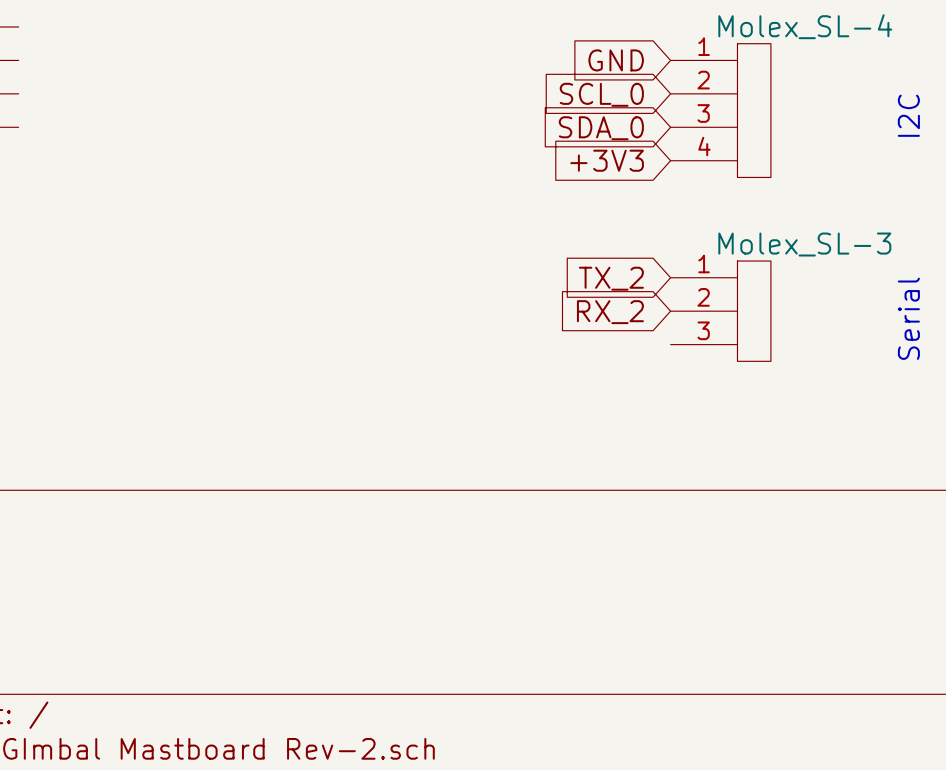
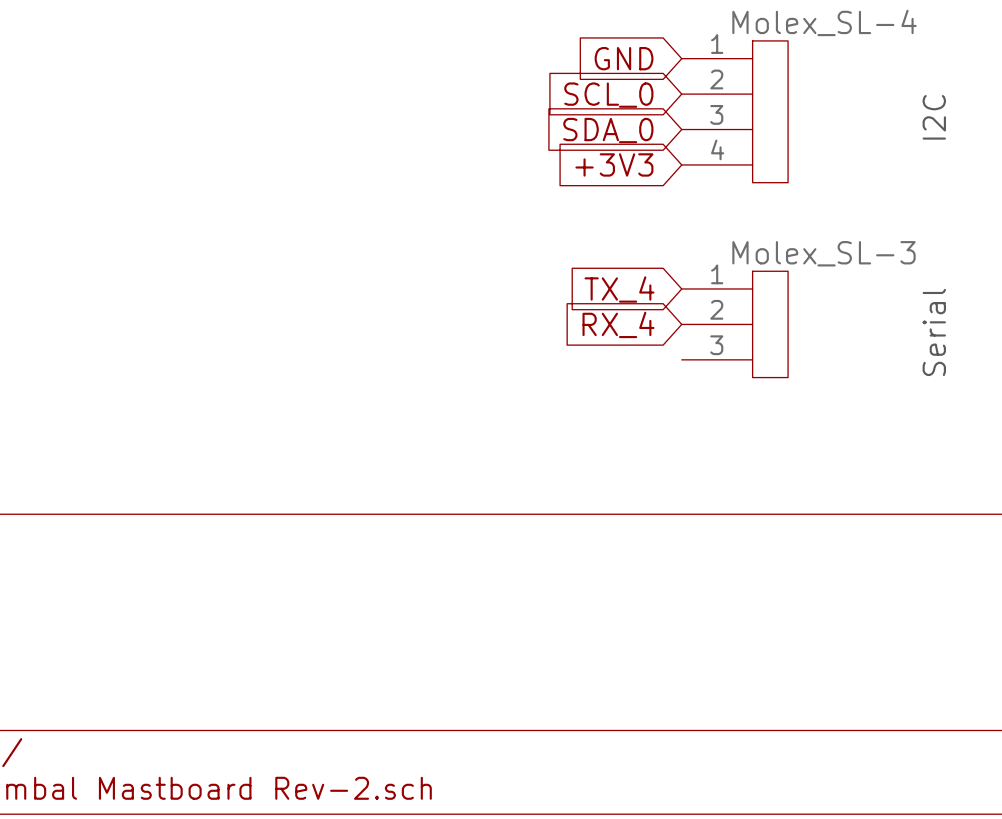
global label: TX_2 (611, 278) -> TX_4 (619, 289)
global label: RX_2 (610, 312) -> RX_4 (618, 324)

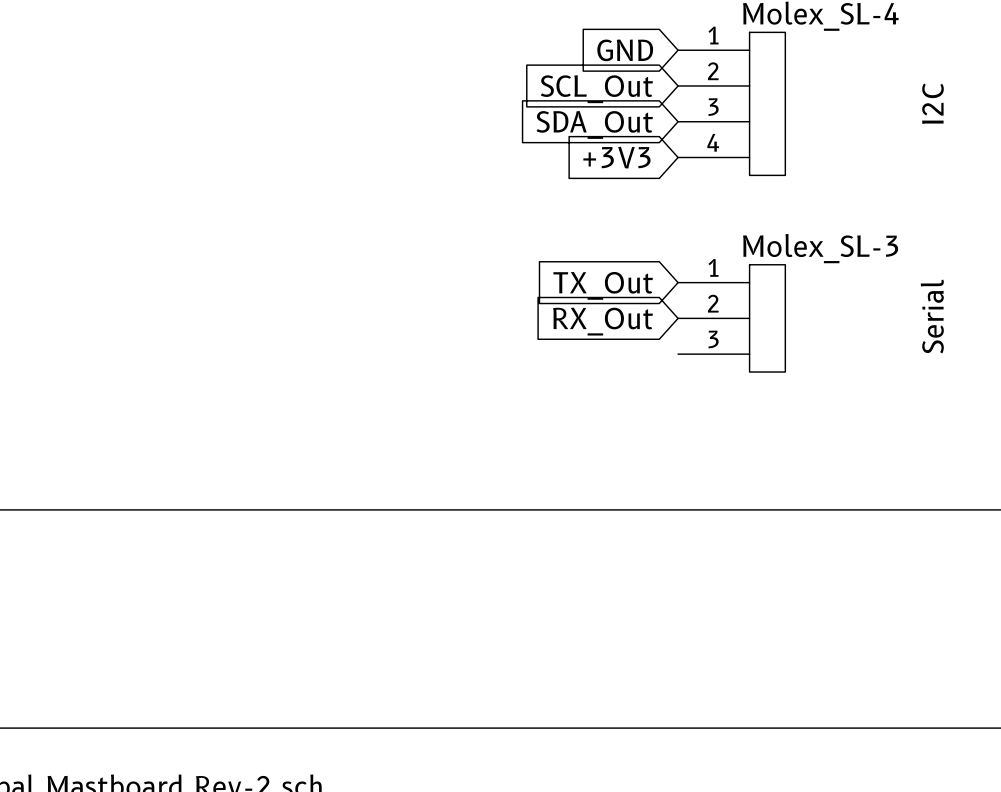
global label: SCL_0 (608, 95) -> SCL_Out (596, 89)
global label: SDA_0 (608, 130) -> SDA_Out (594, 124)
global label: TX_4 (619, 289) -> TX_Out (603, 285)
global label: RX_4 (618, 324) -> RX_Out (602, 321)

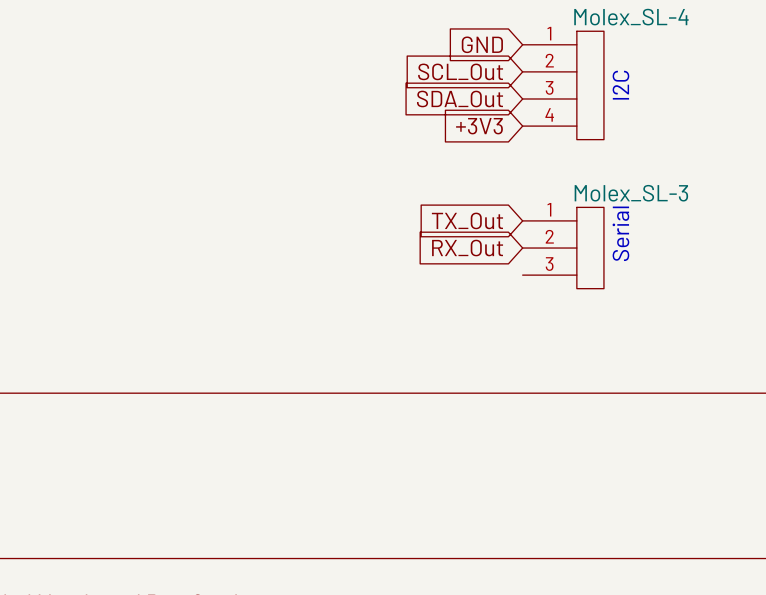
text position: I2C (932, 103) -> I2C (620, 85)
text position: Serial (932, 316) -> Serial (620, 233)

